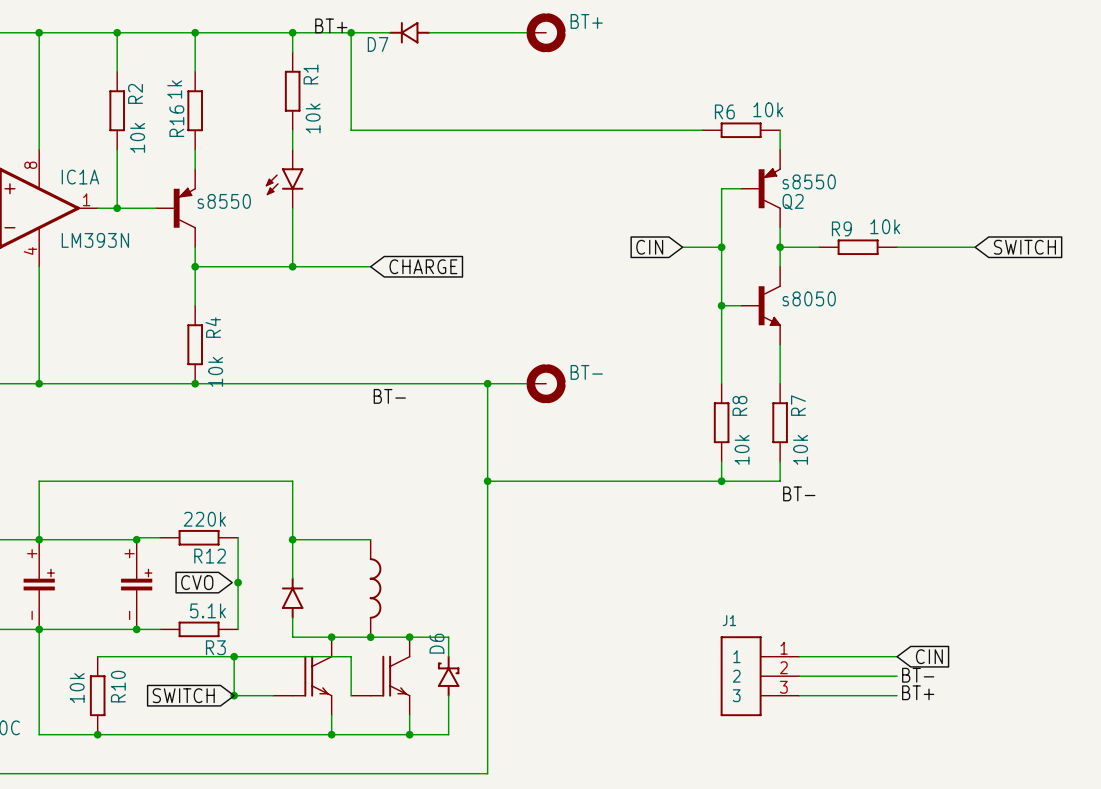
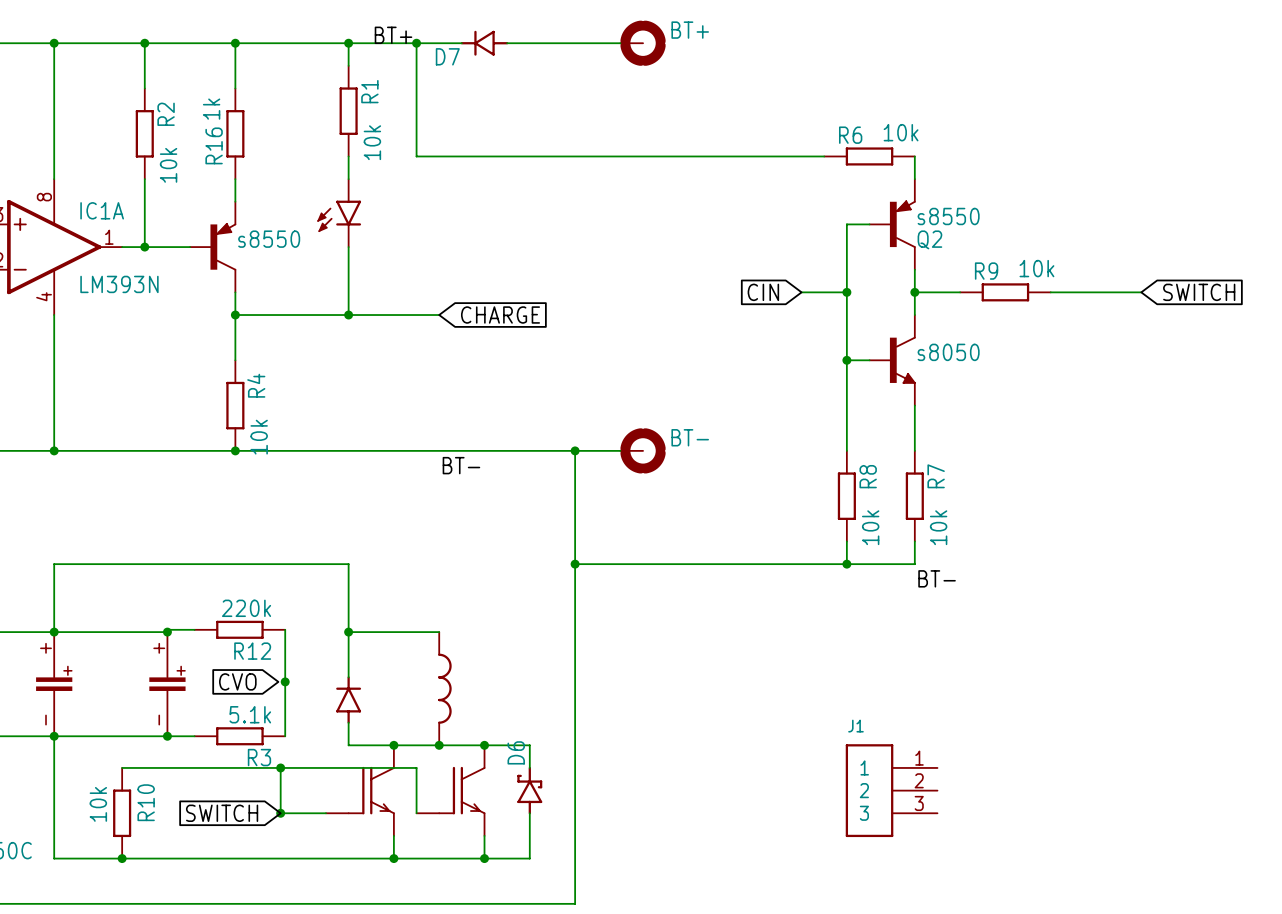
wire: (799, 656) (897, 656) -> none
global label: CIN (929, 656) -> none
label: BT- (918, 675) -> none
wire: (799, 676) (897, 676) -> none
label: BT+ (918, 692) -> none
wire: (799, 695) (897, 695) -> none

